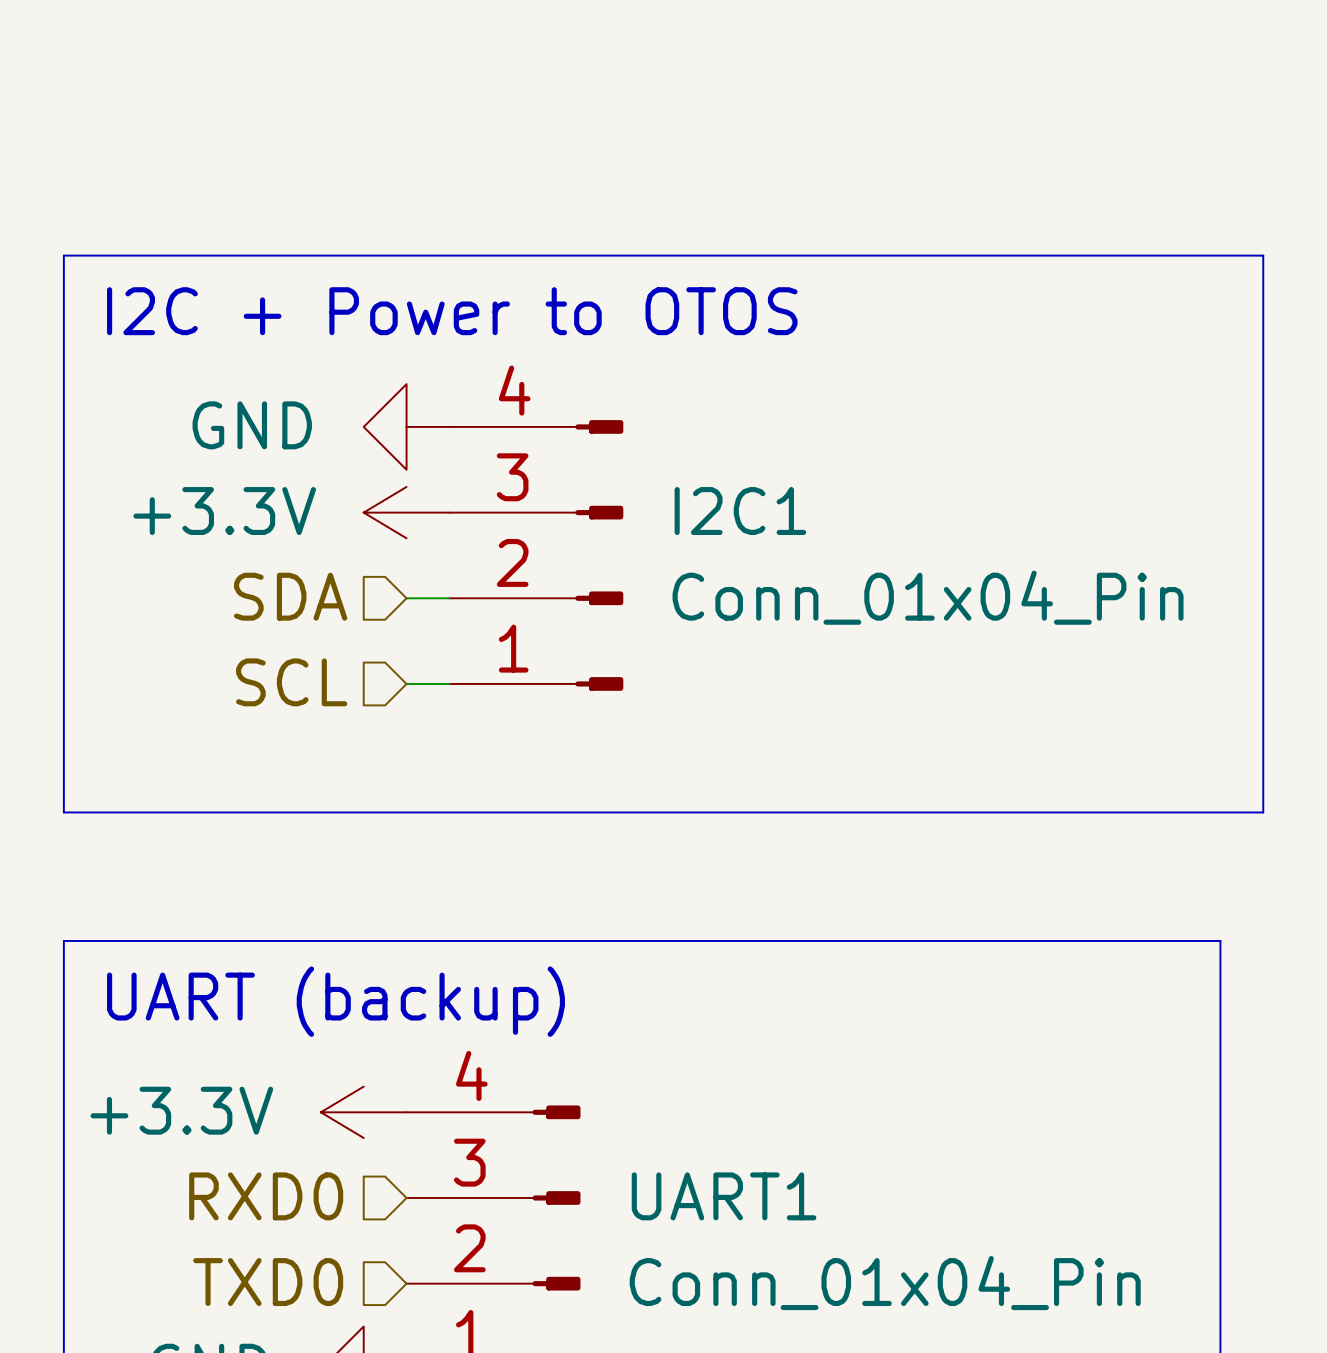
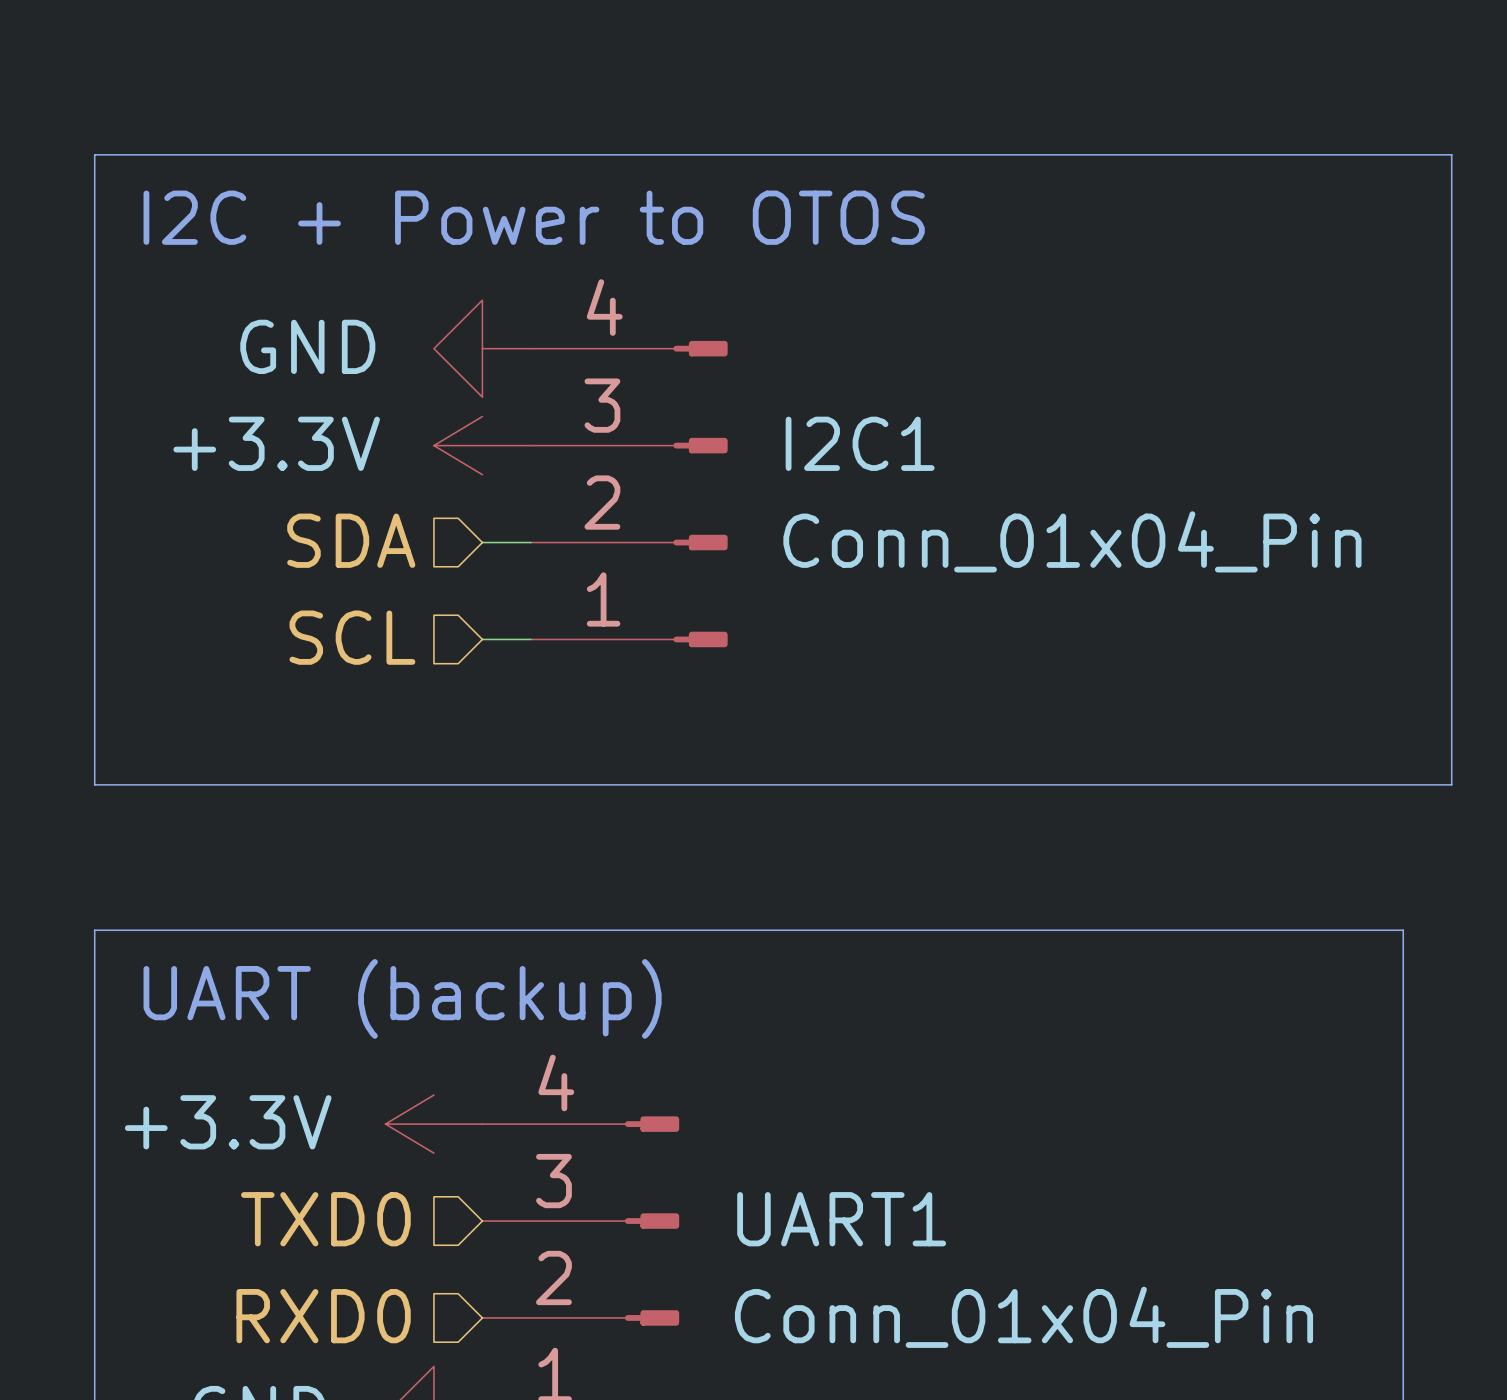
hierarchical label: RXD0 (266, 1196) -> TXD0 (325, 1219)
hierarchical label: TXD0 (268, 1282) -> RXD0 (323, 1316)

